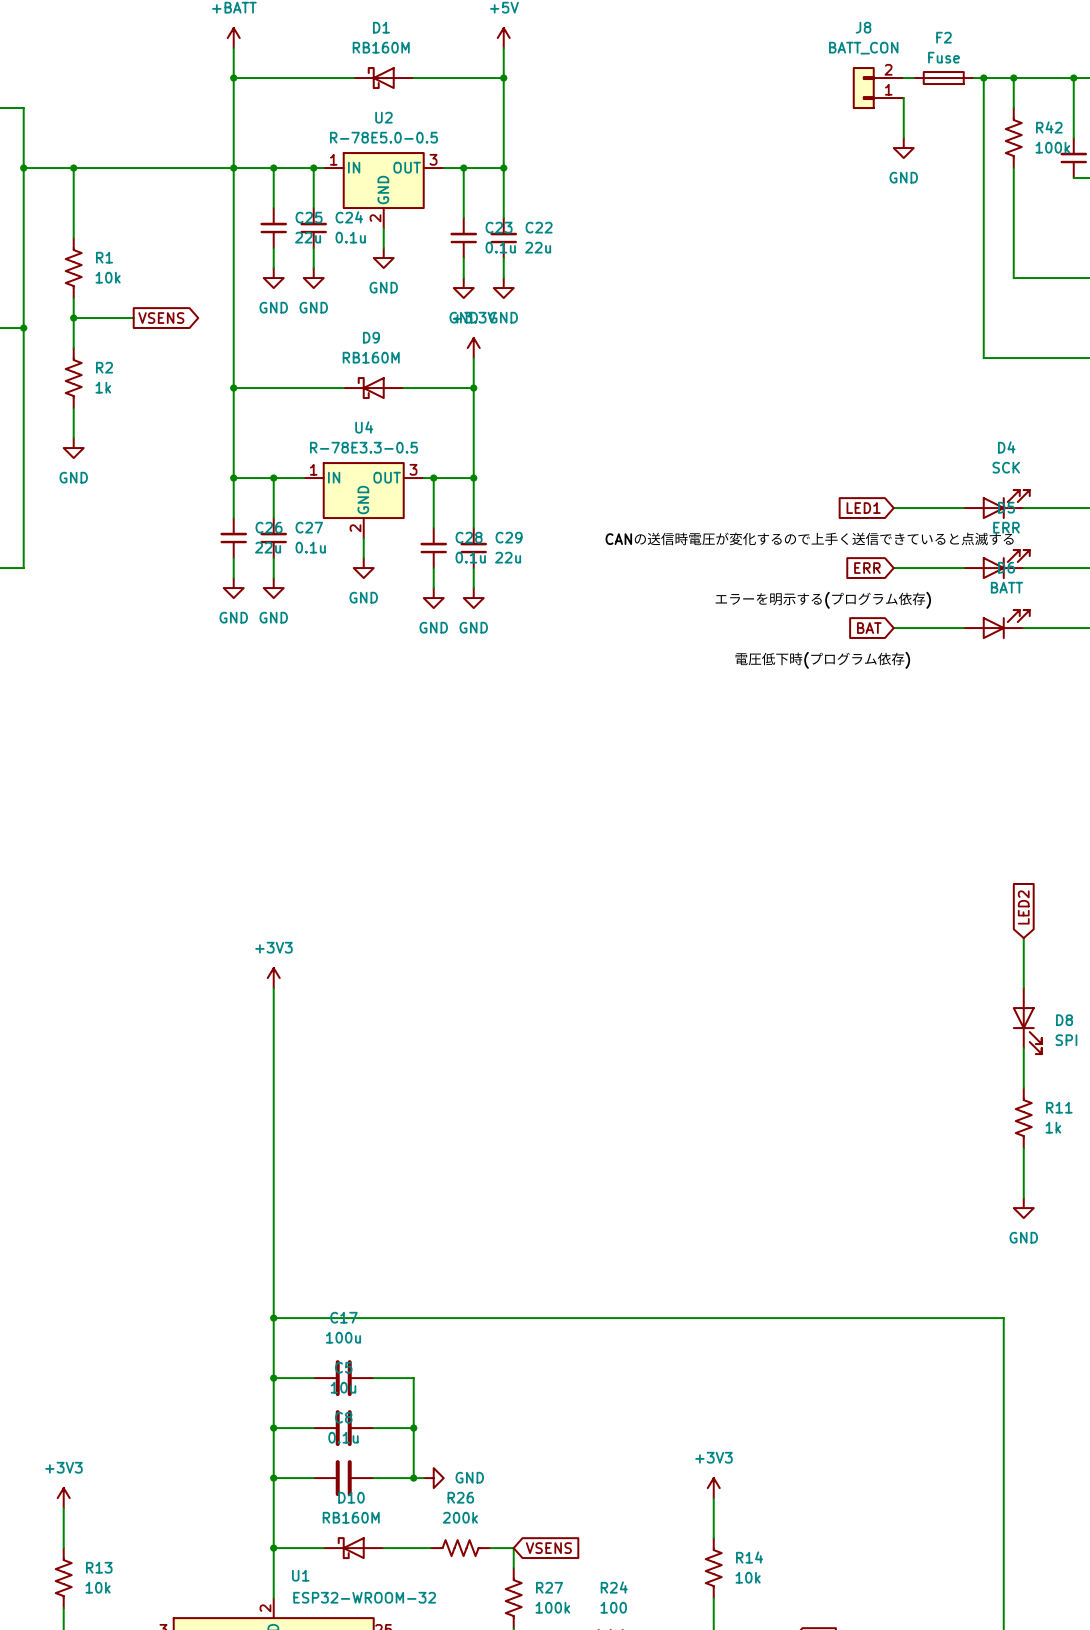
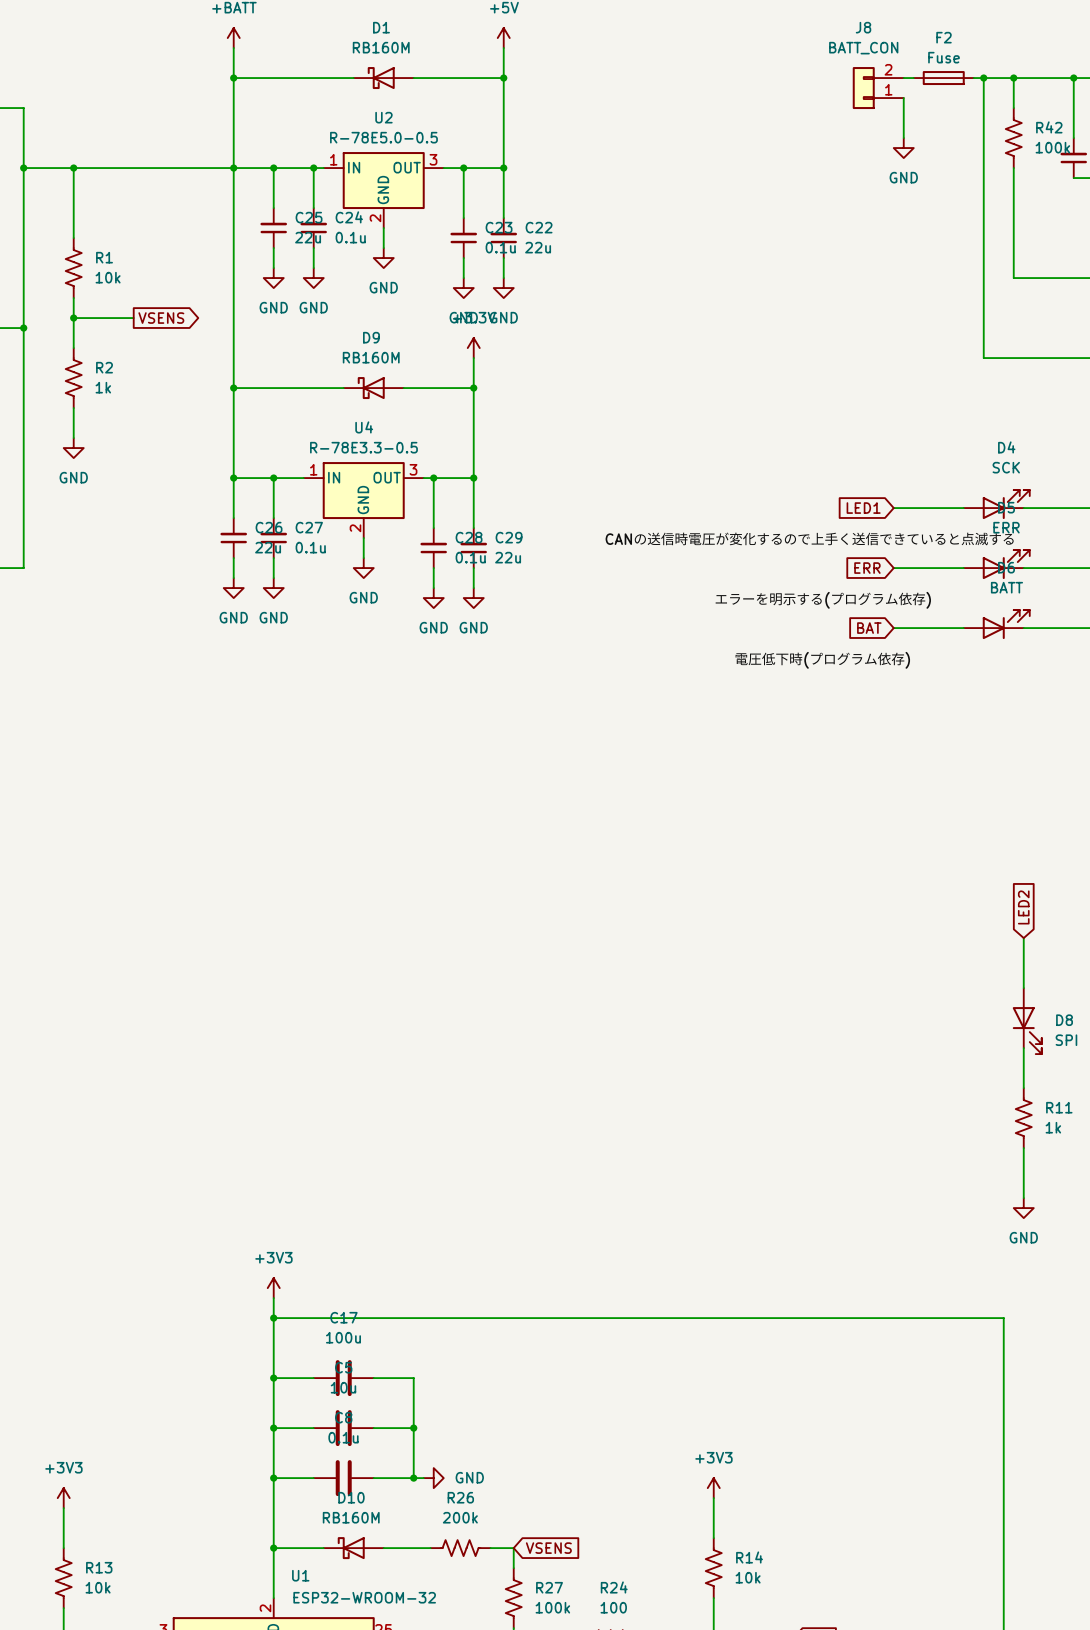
power symbol: +3V3 (273, 978) -> none
wire: (273, 988) (273, 1298) -> none
power symbol: none -> +3V3 (273, 1288)

